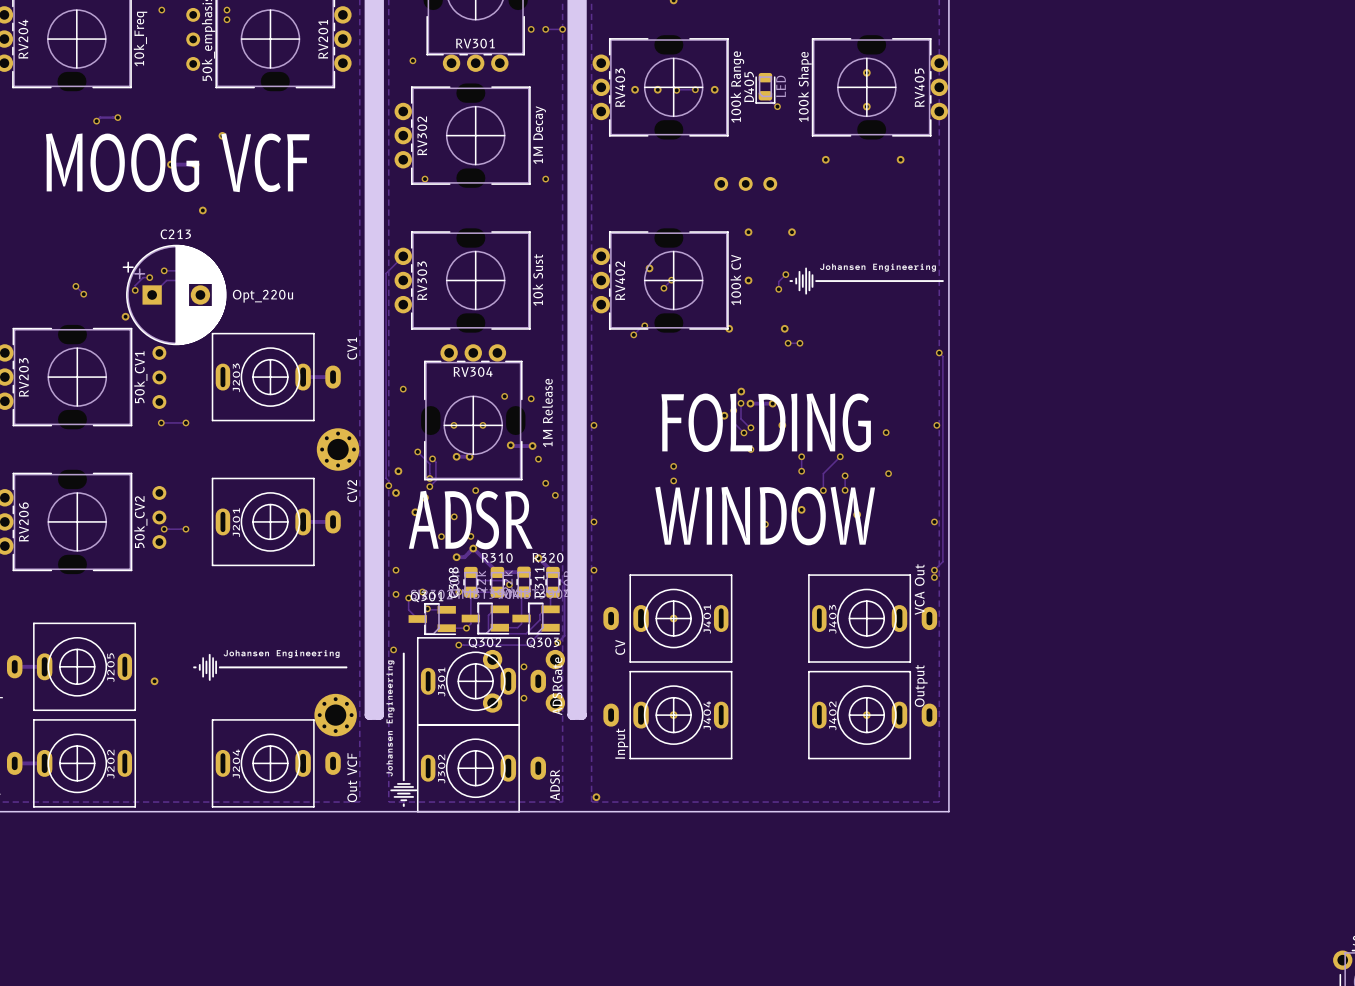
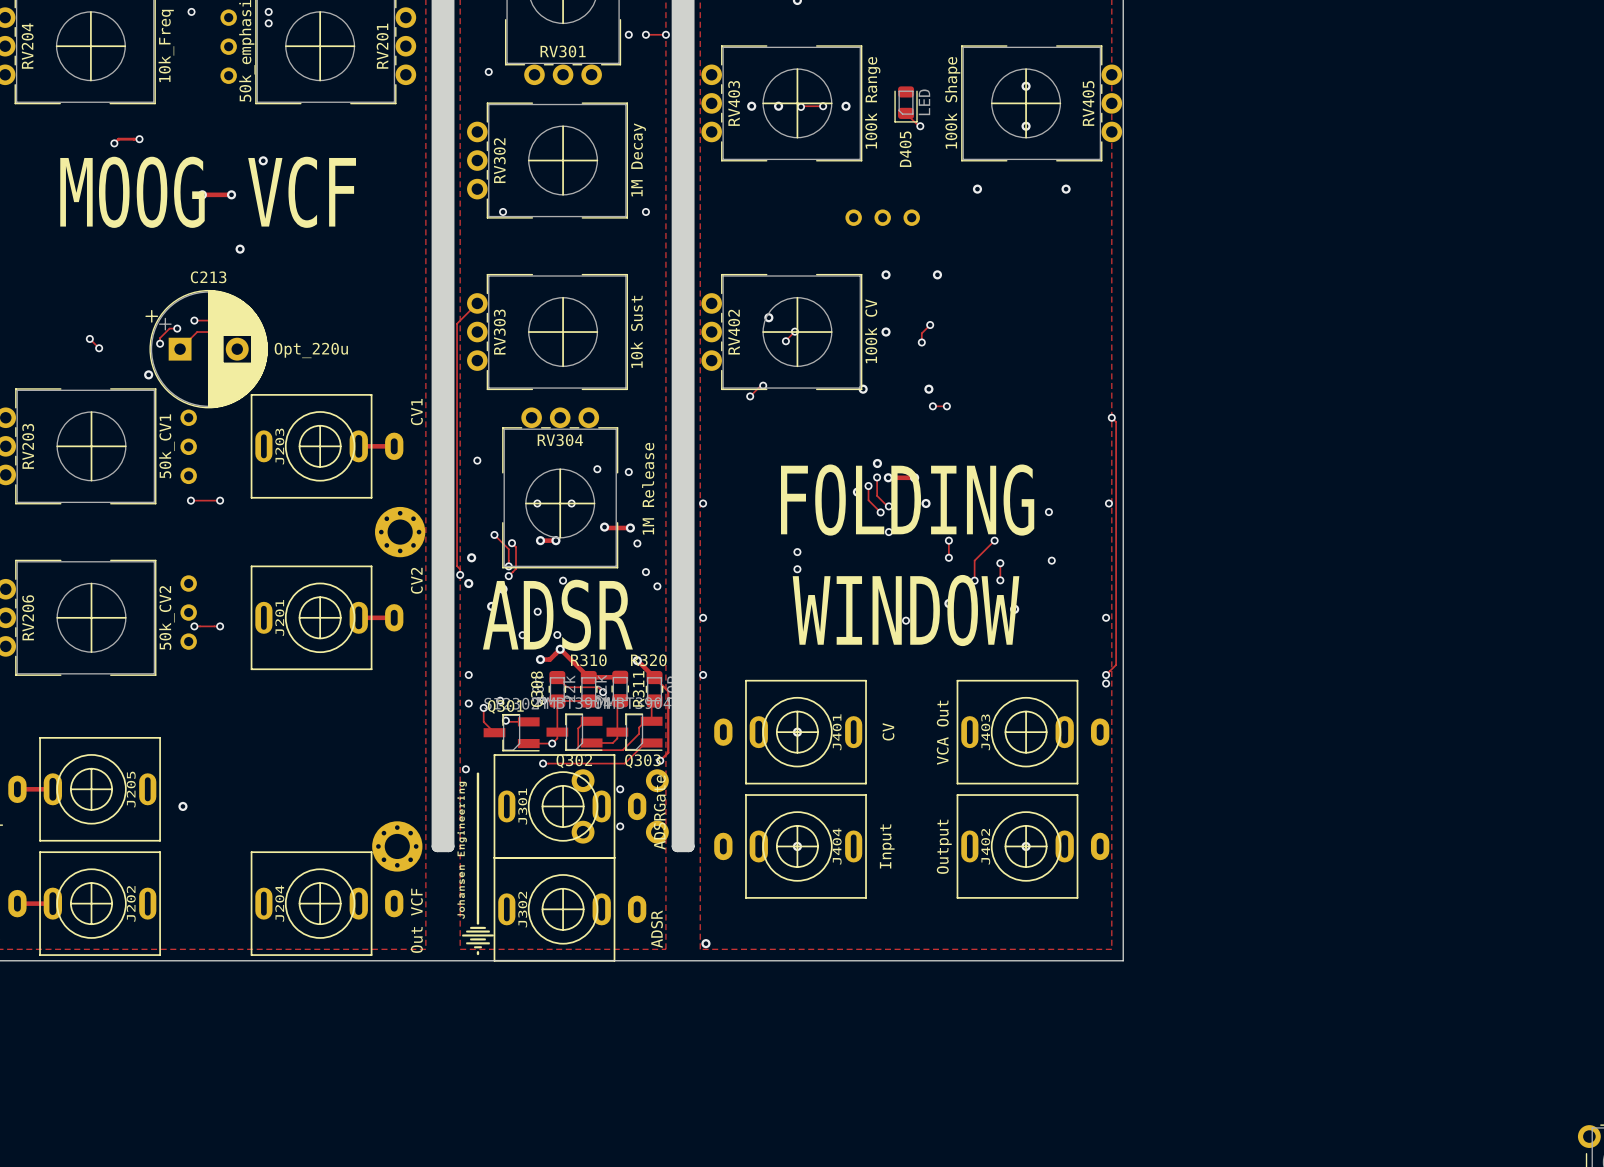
D405 name position: D405 (749, 86) -> D405 (905, 149)
drawing: [789, 263, 944, 295] -> none
J403 value position: VCA Out (919, 589) -> VCA Out (942, 732)
J401 value position: CV (620, 647) -> CV (888, 731)
drawing: [193, 650, 348, 681] -> none
J402 value position: Output (921, 685) -> Output (944, 846)
J404 value position: Input (621, 743) -> Input (887, 846)

